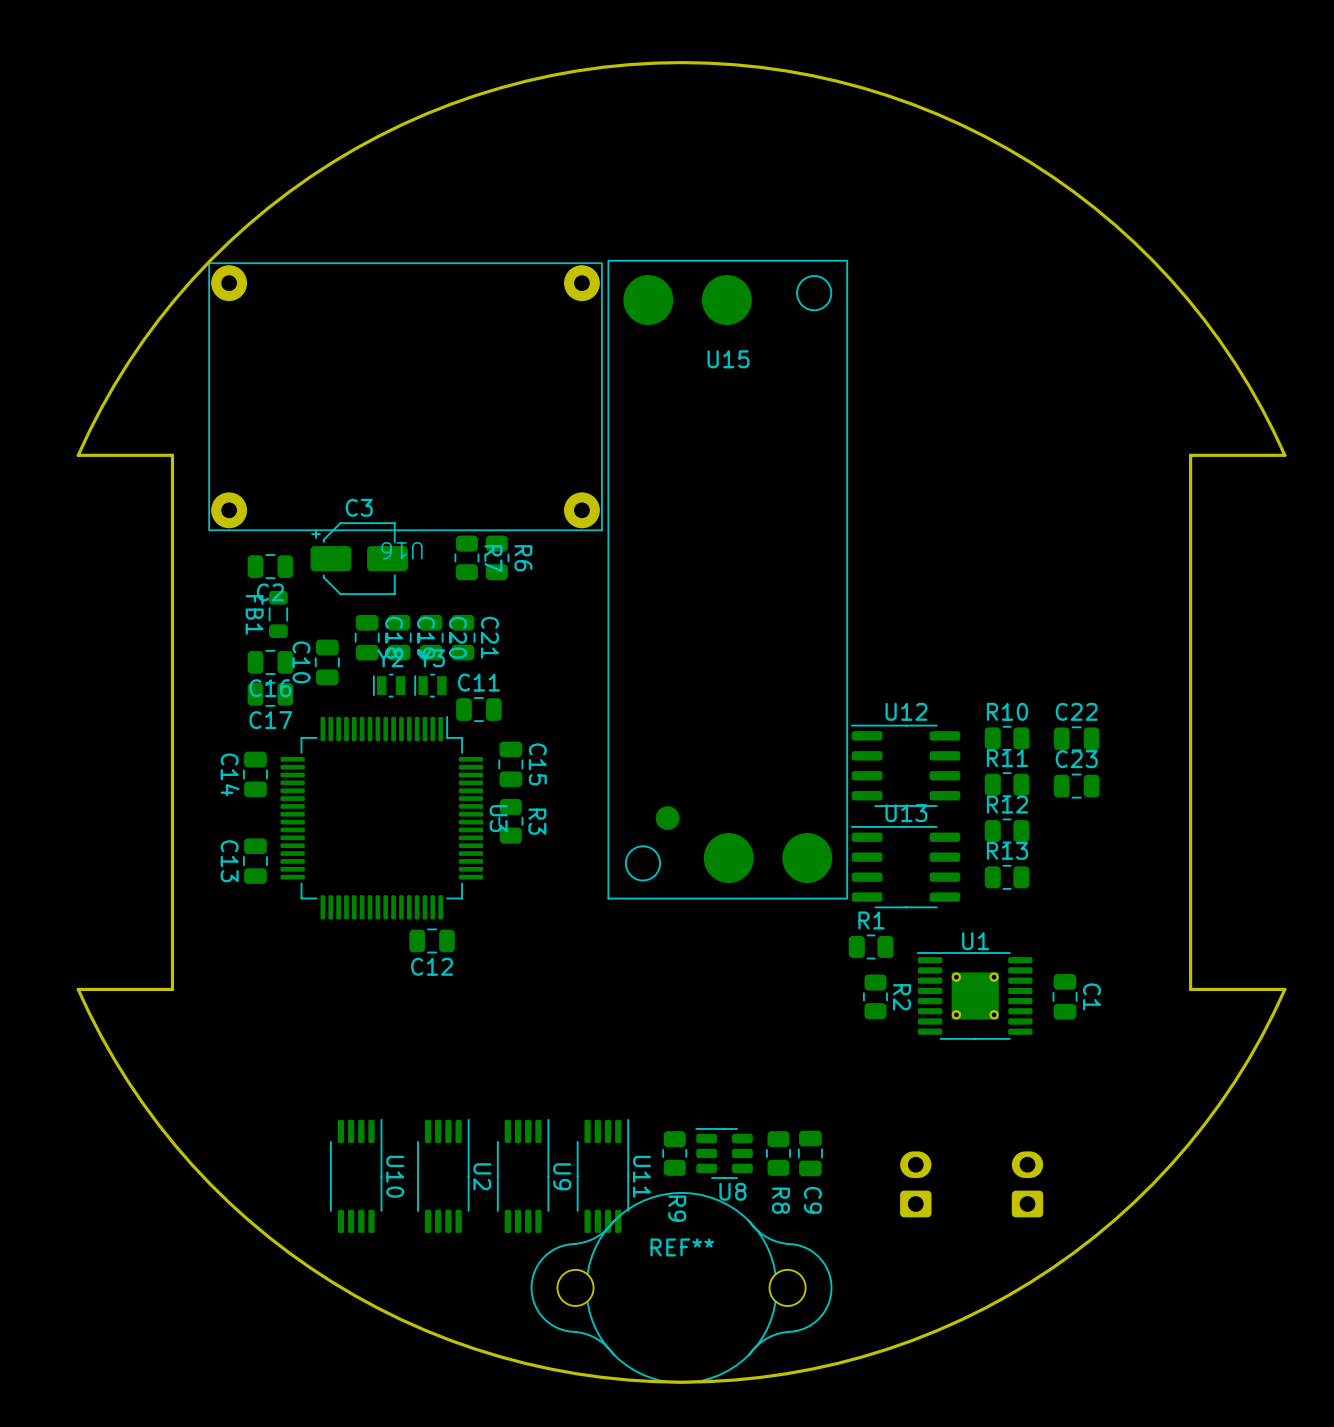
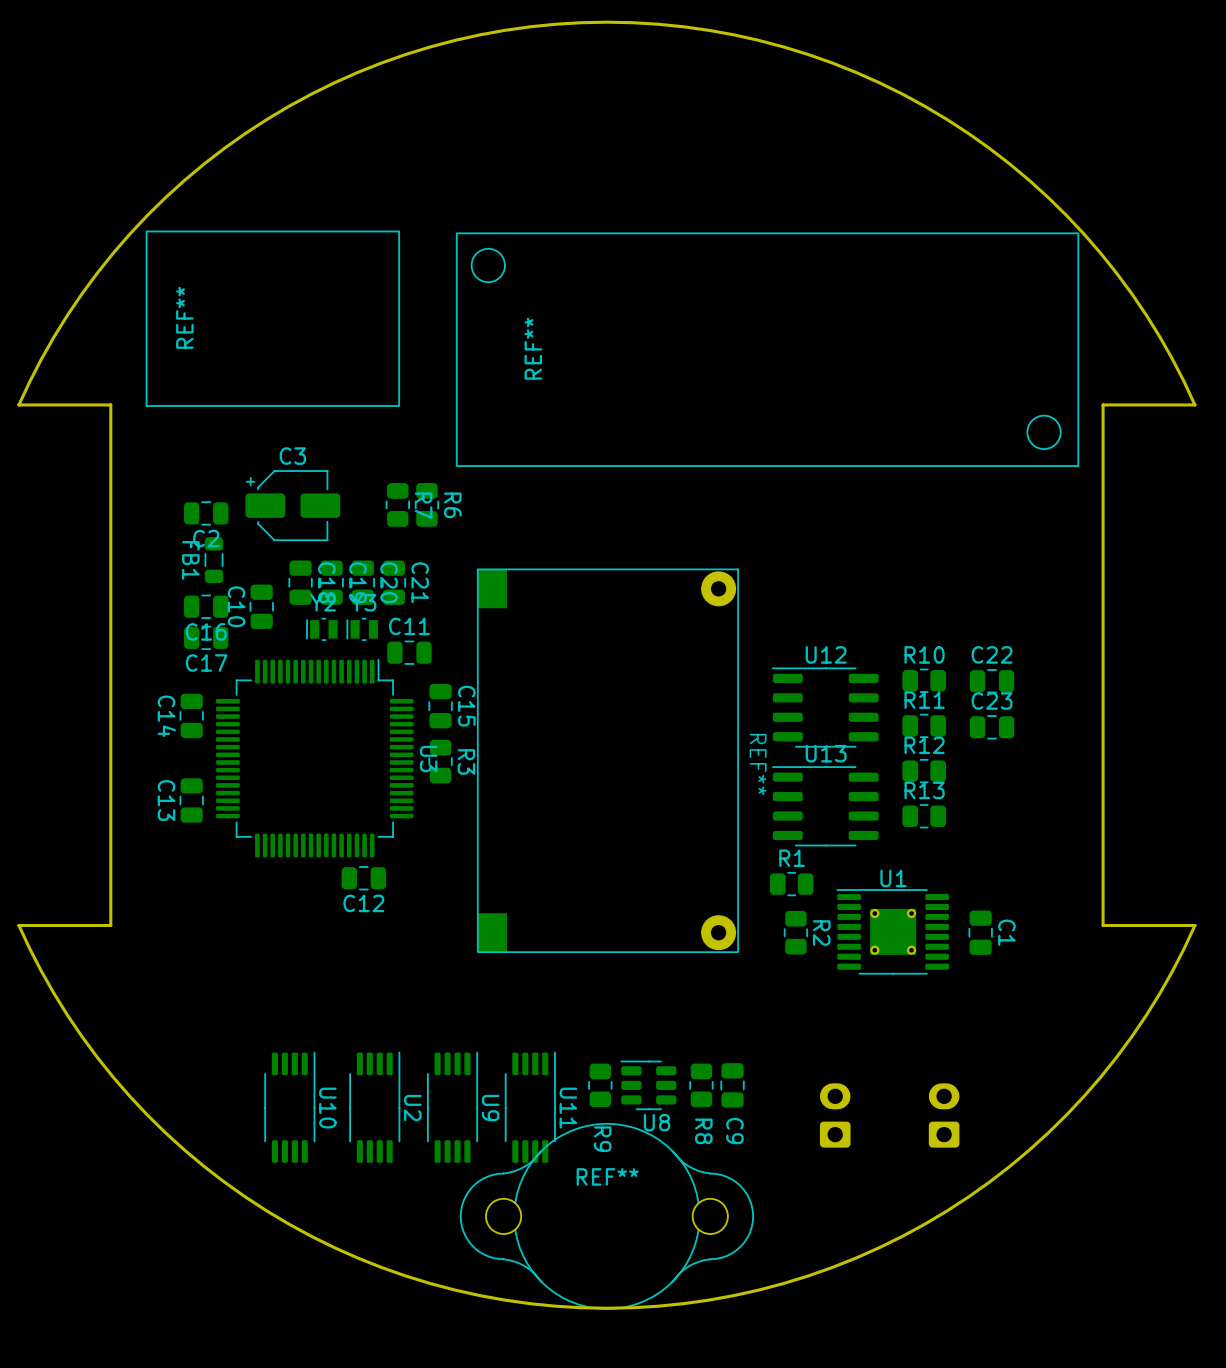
REF**: none -> (272, 318)
U16: (405, 396) -> none
REF**: none -> (767, 349)
U15: (727, 579) -> none
REF**: none -> (607, 760)

